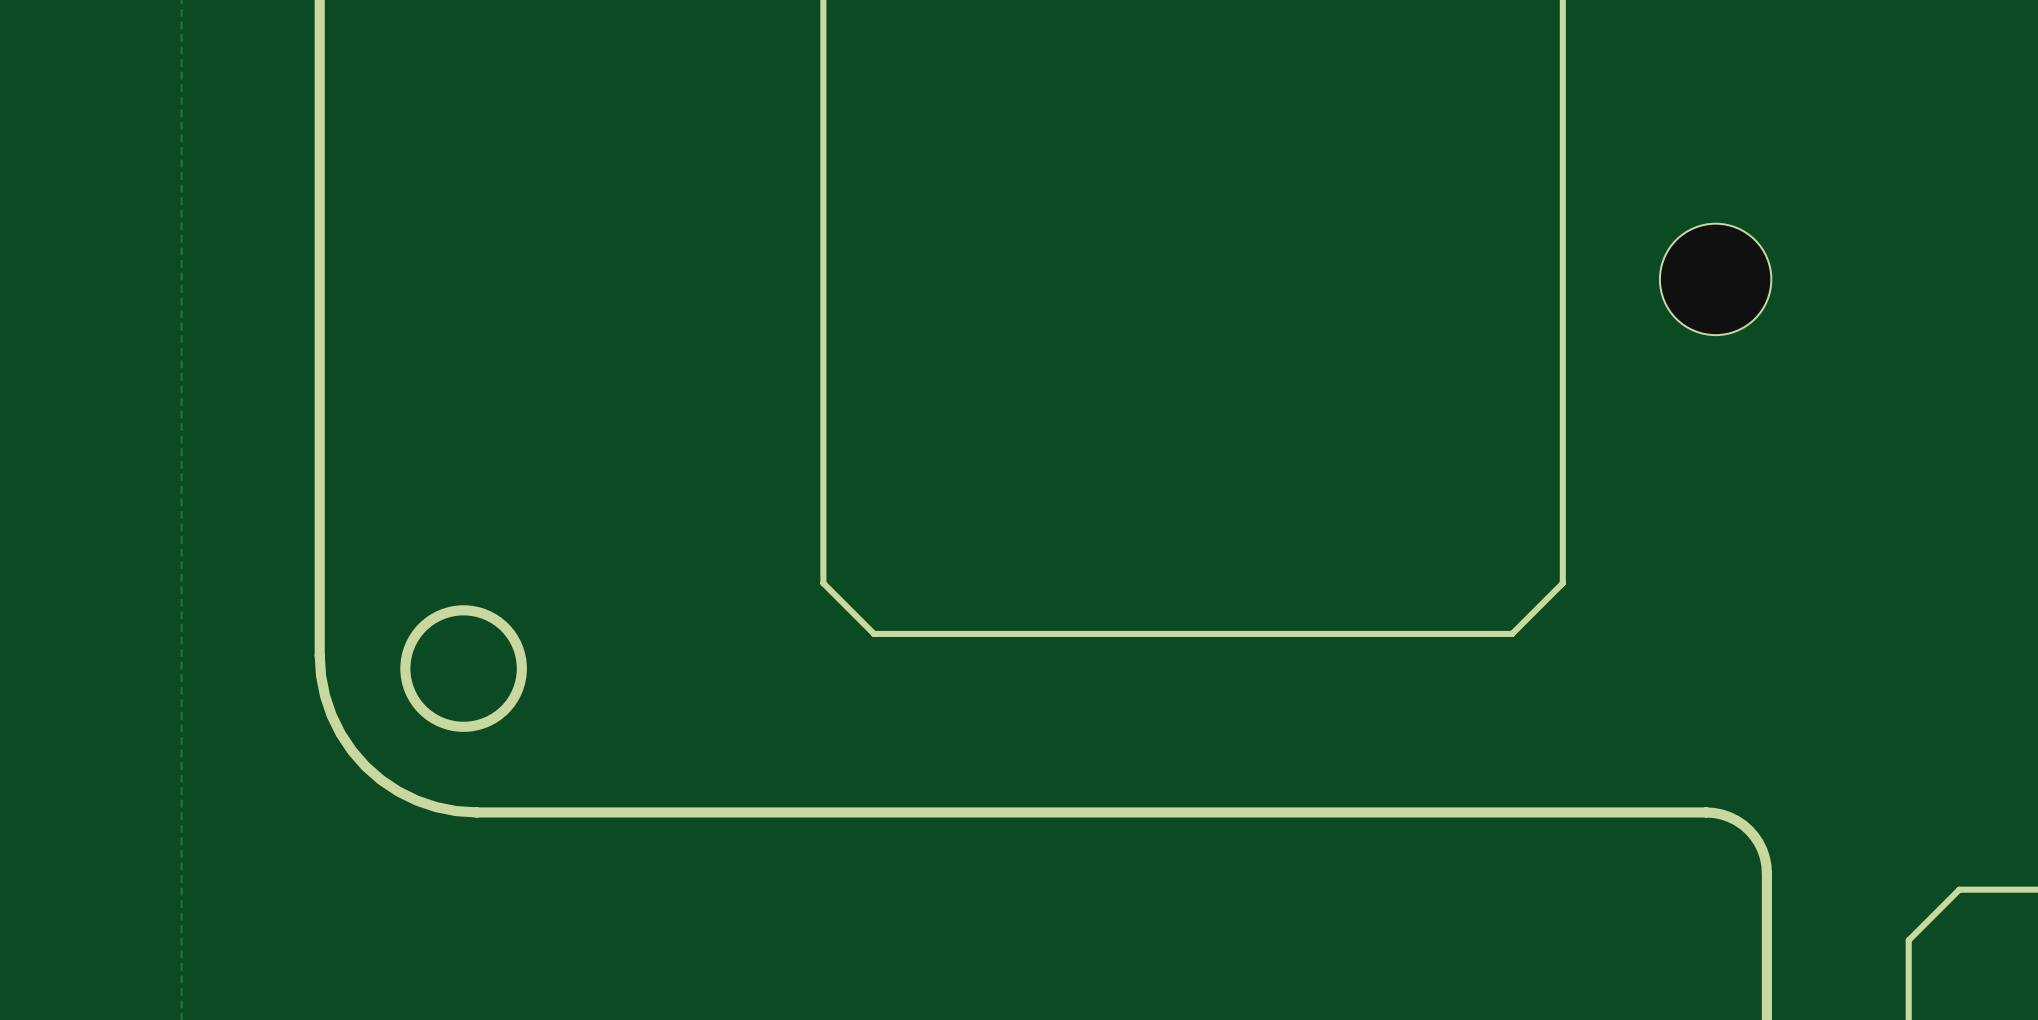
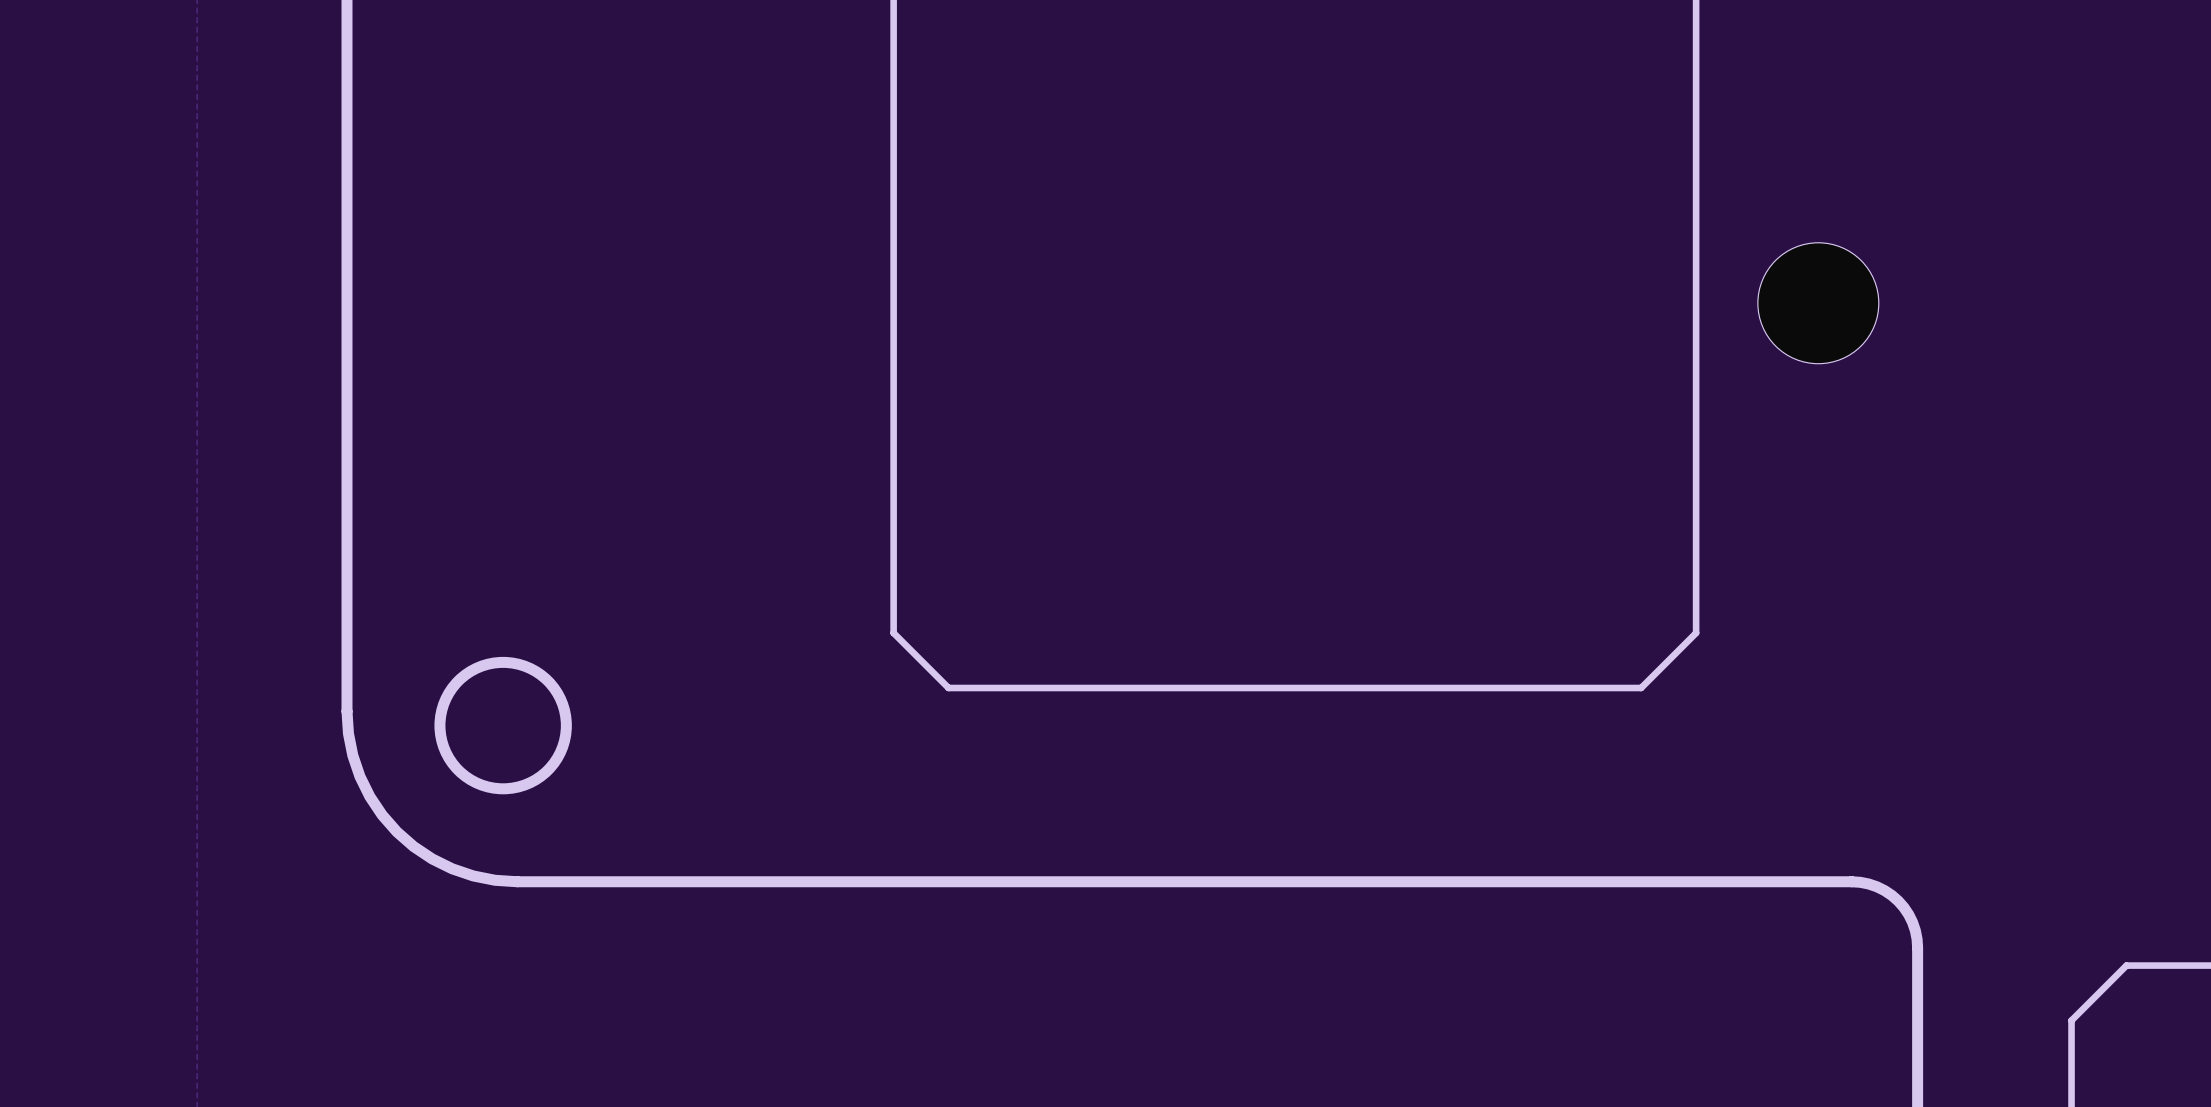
part position: (1715, 279) -> (1818, 303)

